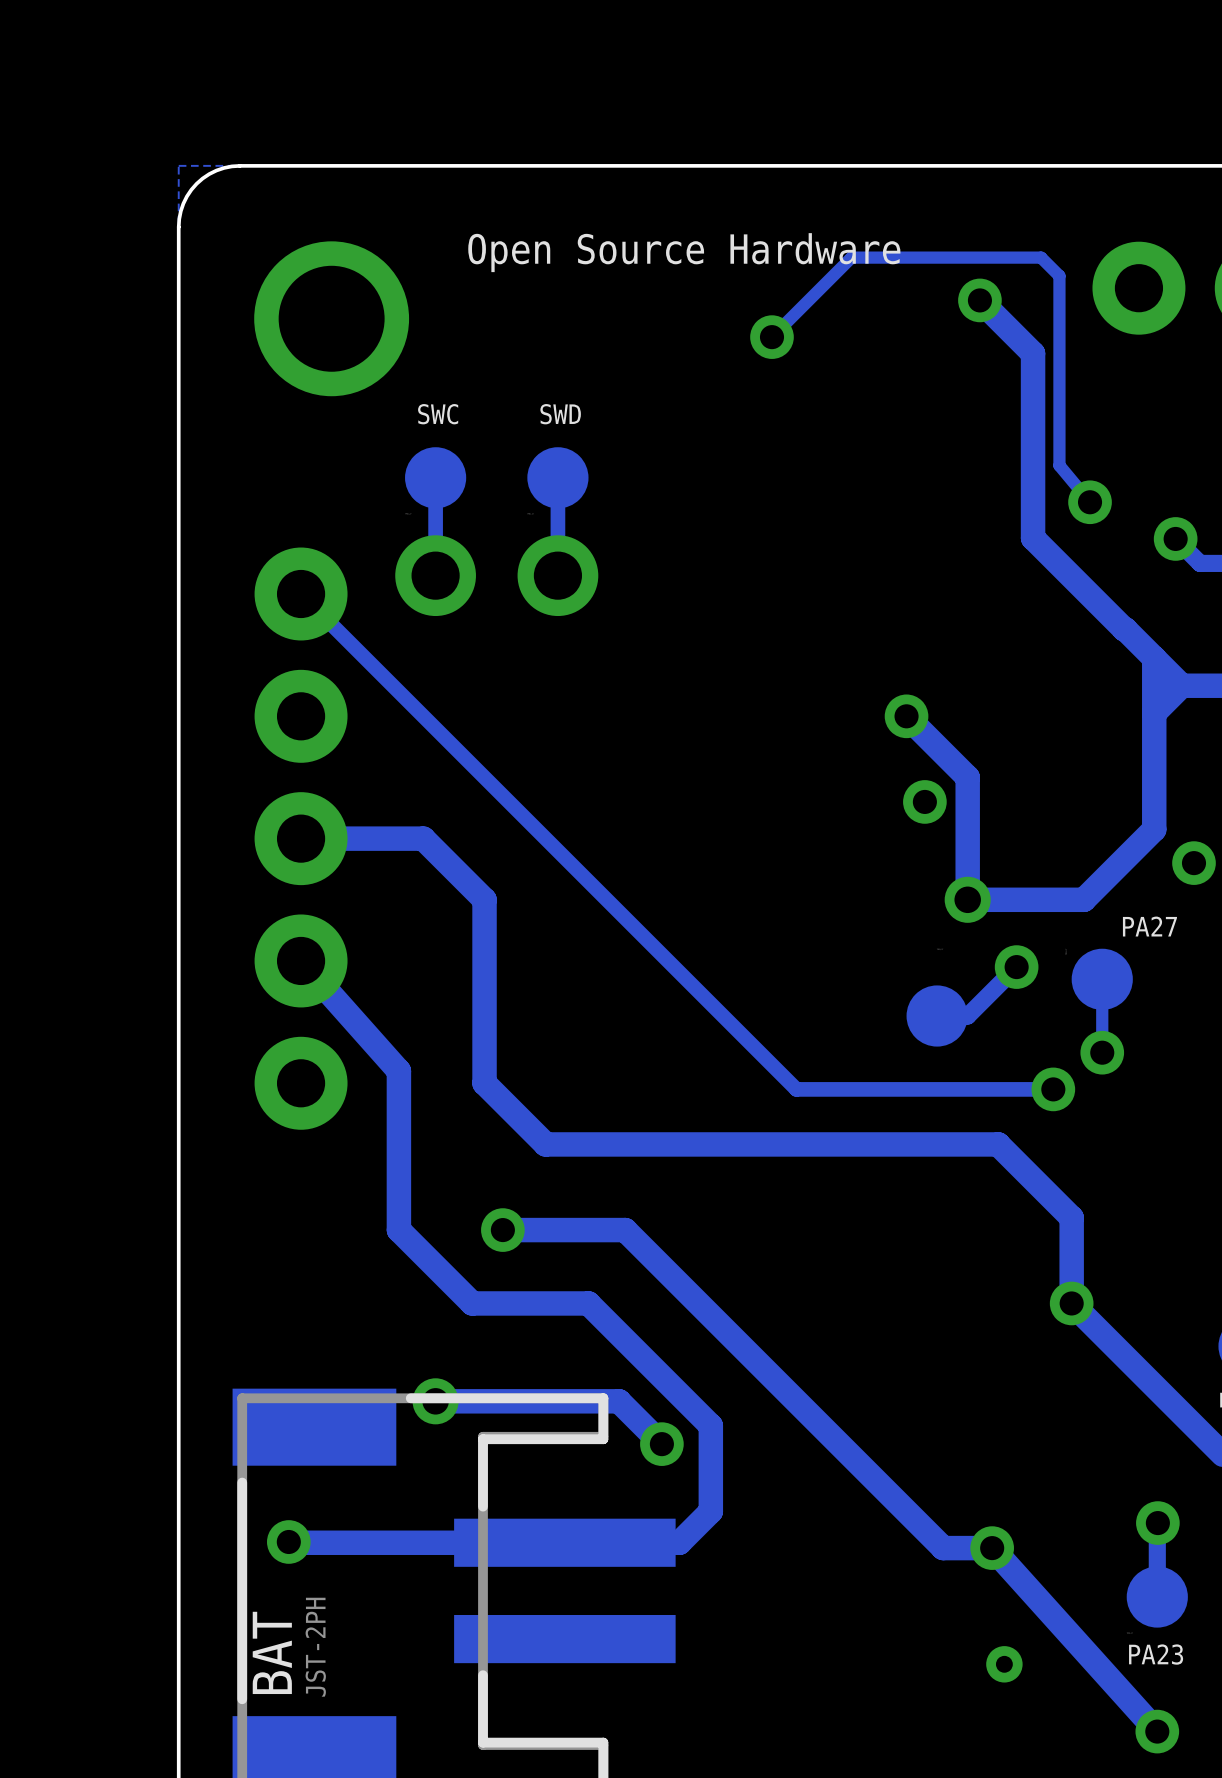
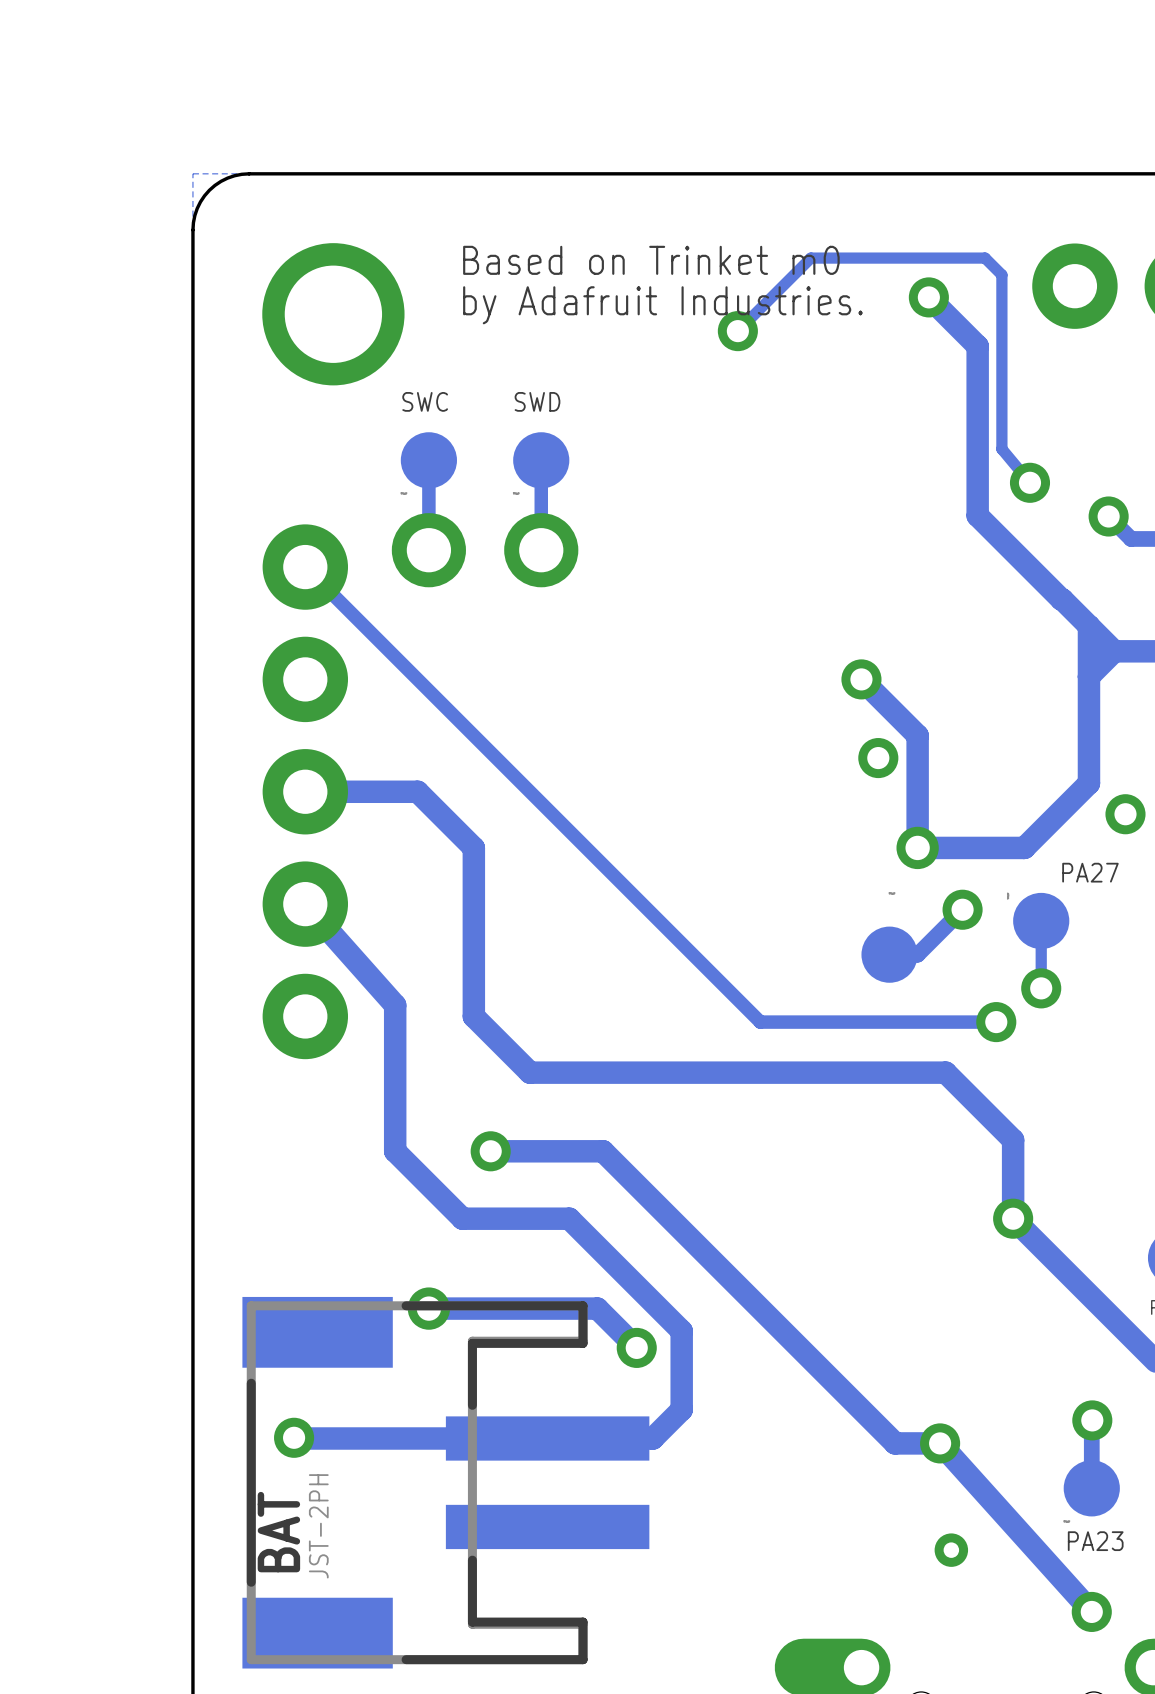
text: Open Source Hardware (684, 252) -> Based on Trinket m0 (651, 260)
text: none -> by Adafruit Industries. (662, 305)

